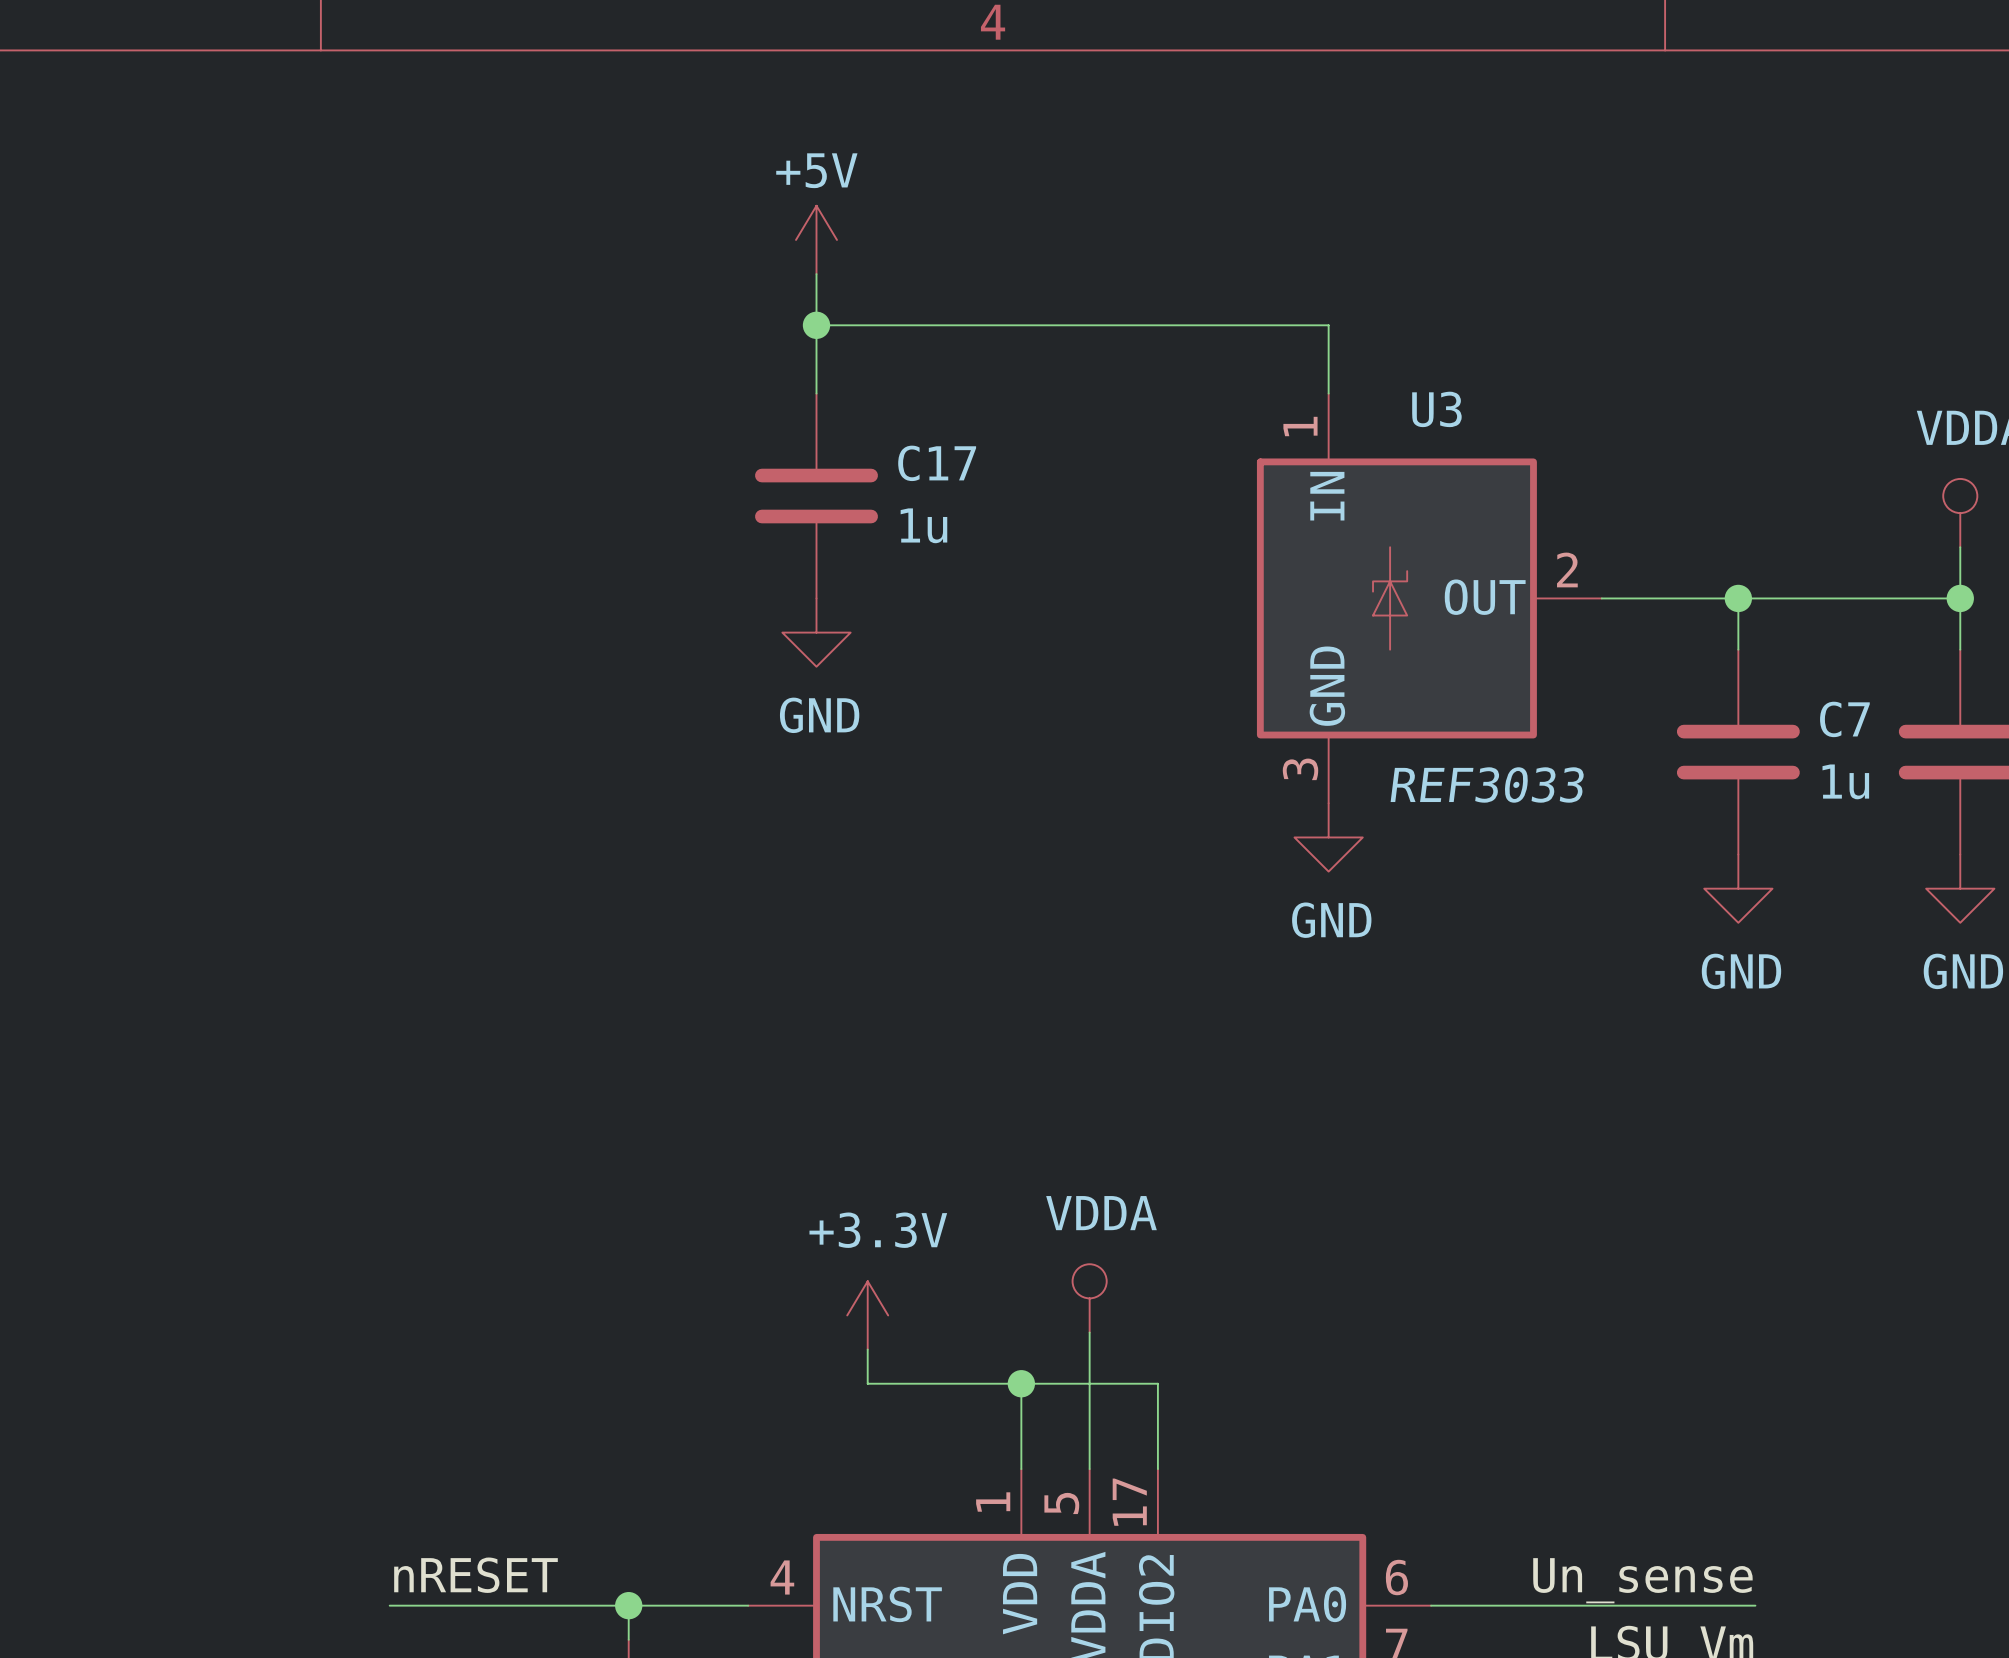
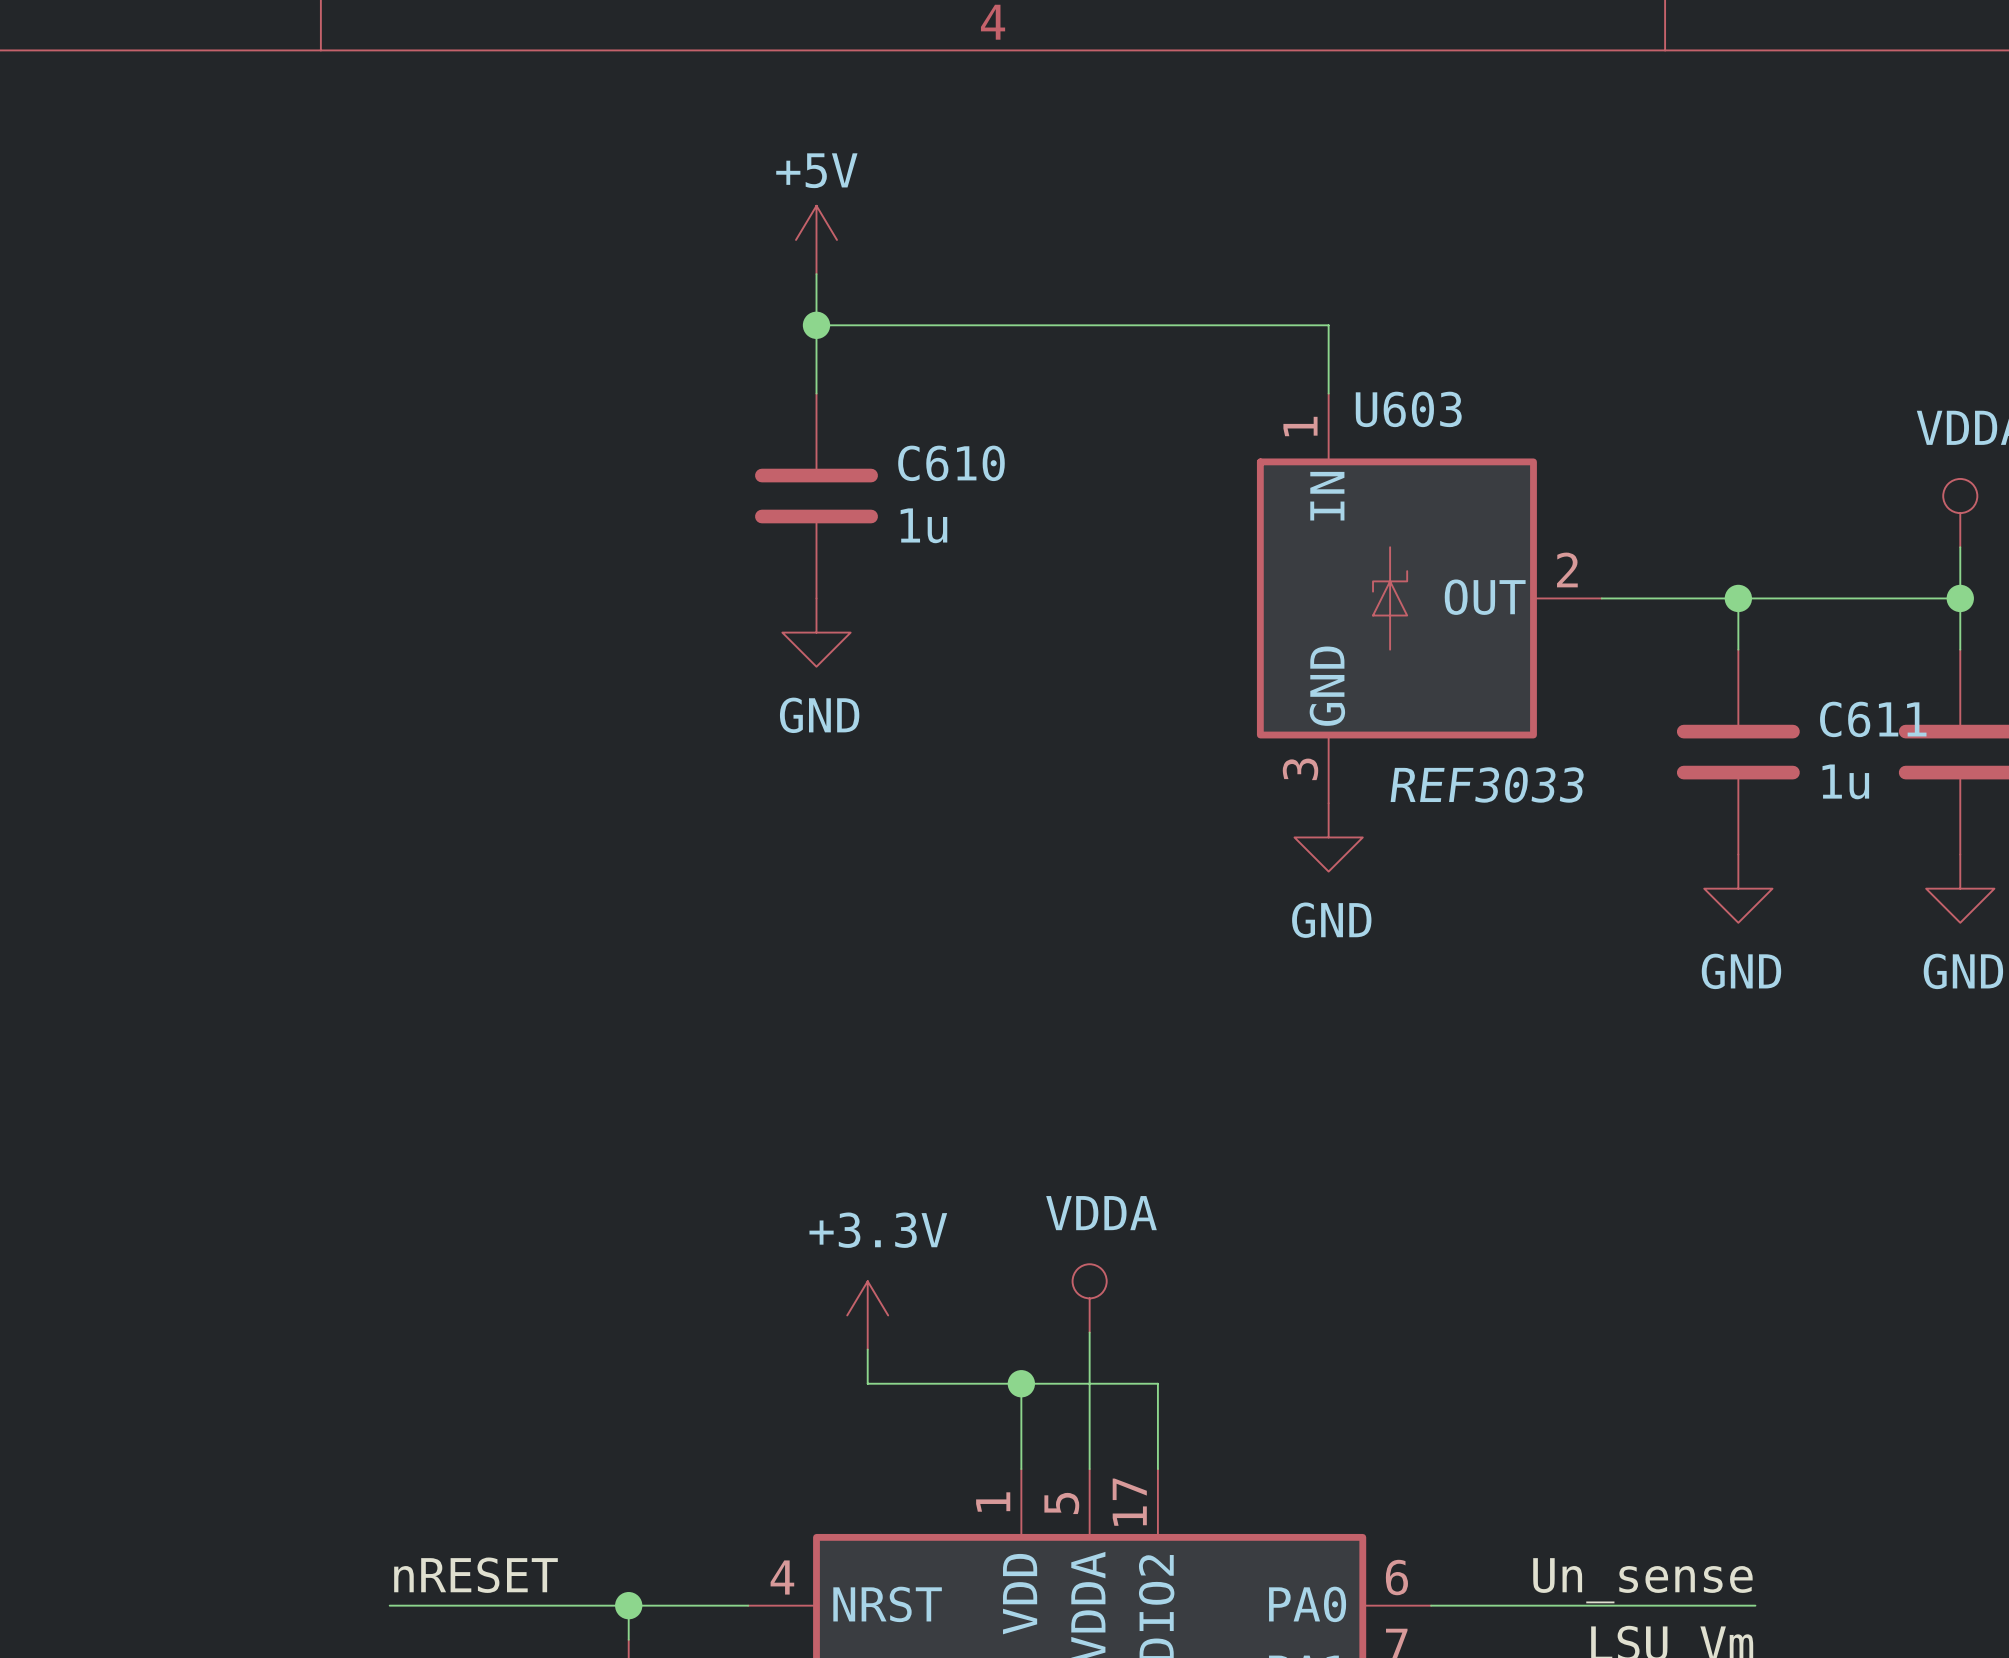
U3 name: U3 (1436, 409) -> U603 (1408, 409)
C17 name: C17 (937, 463) -> C610 (951, 463)
C7 name: C7 (1844, 719) -> C611 (1873, 719)

